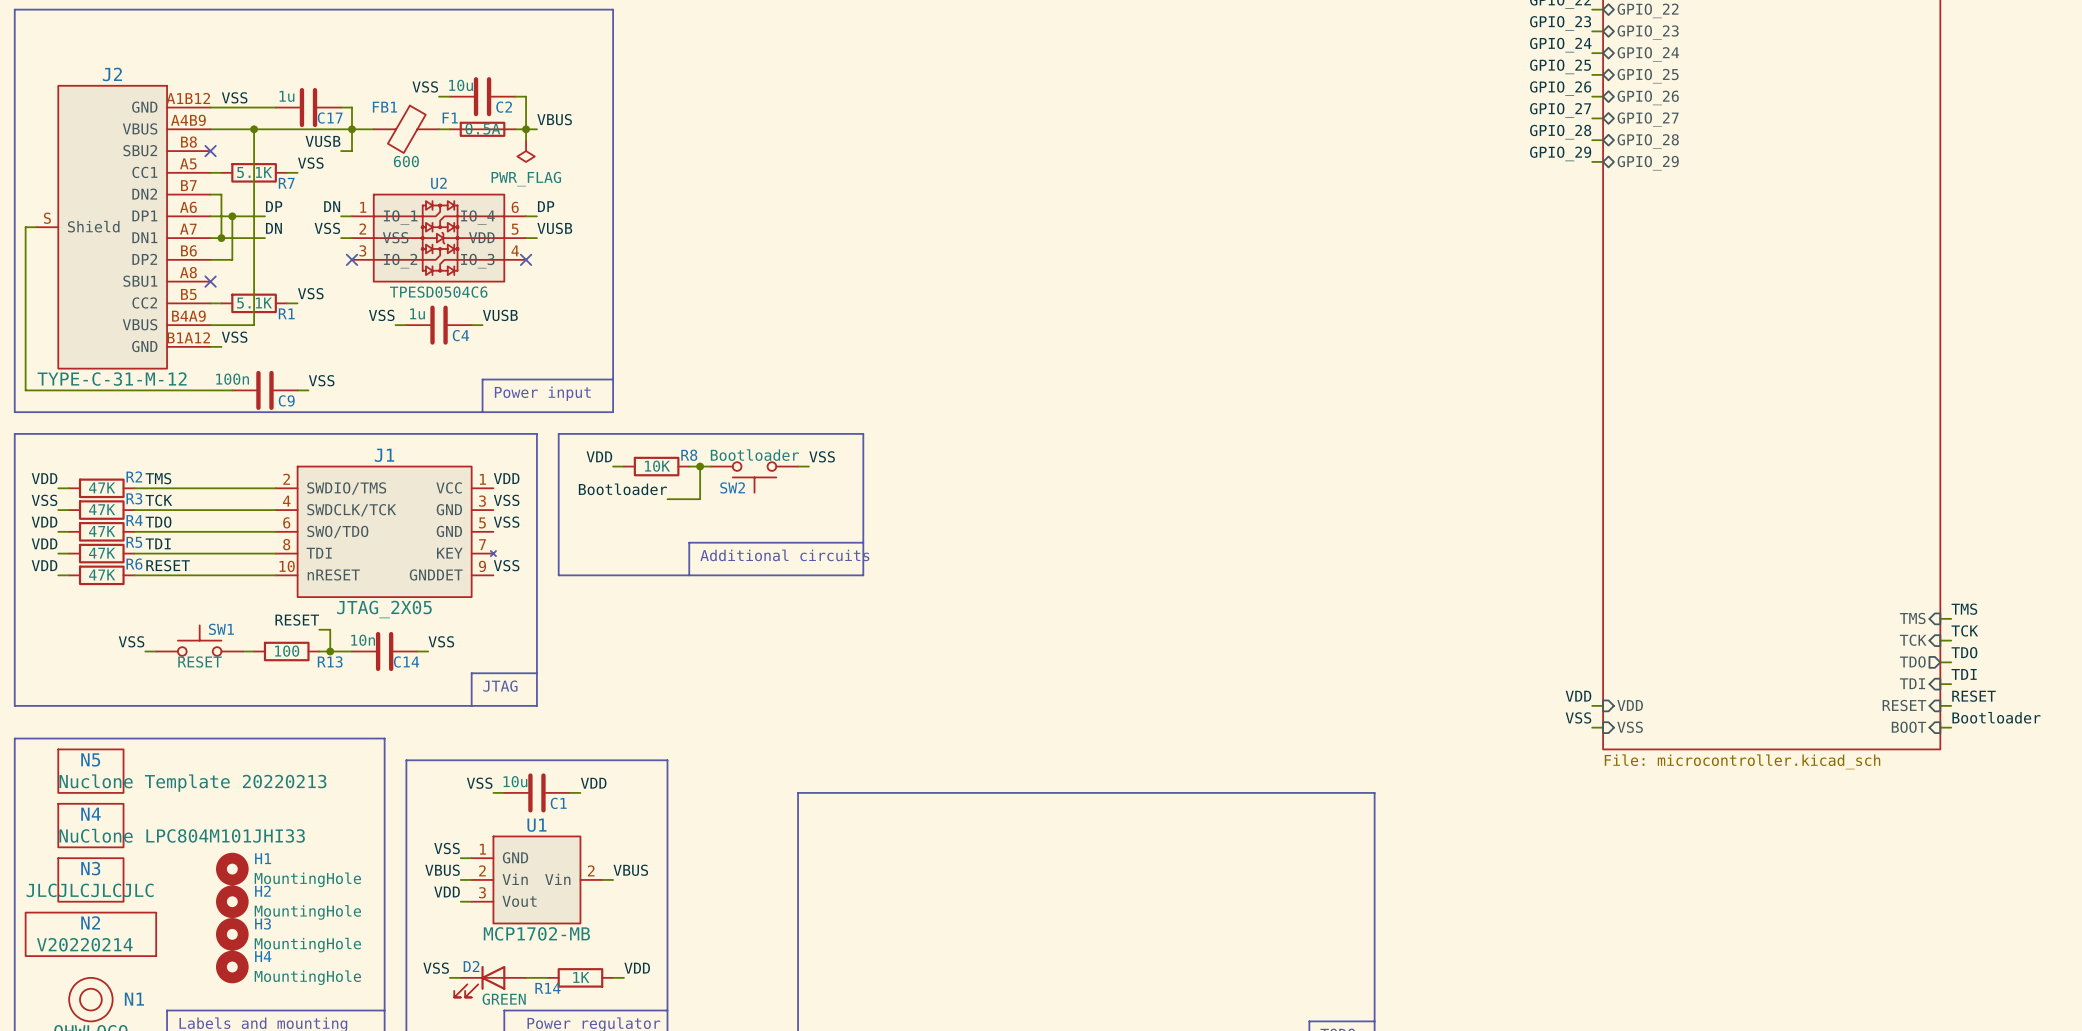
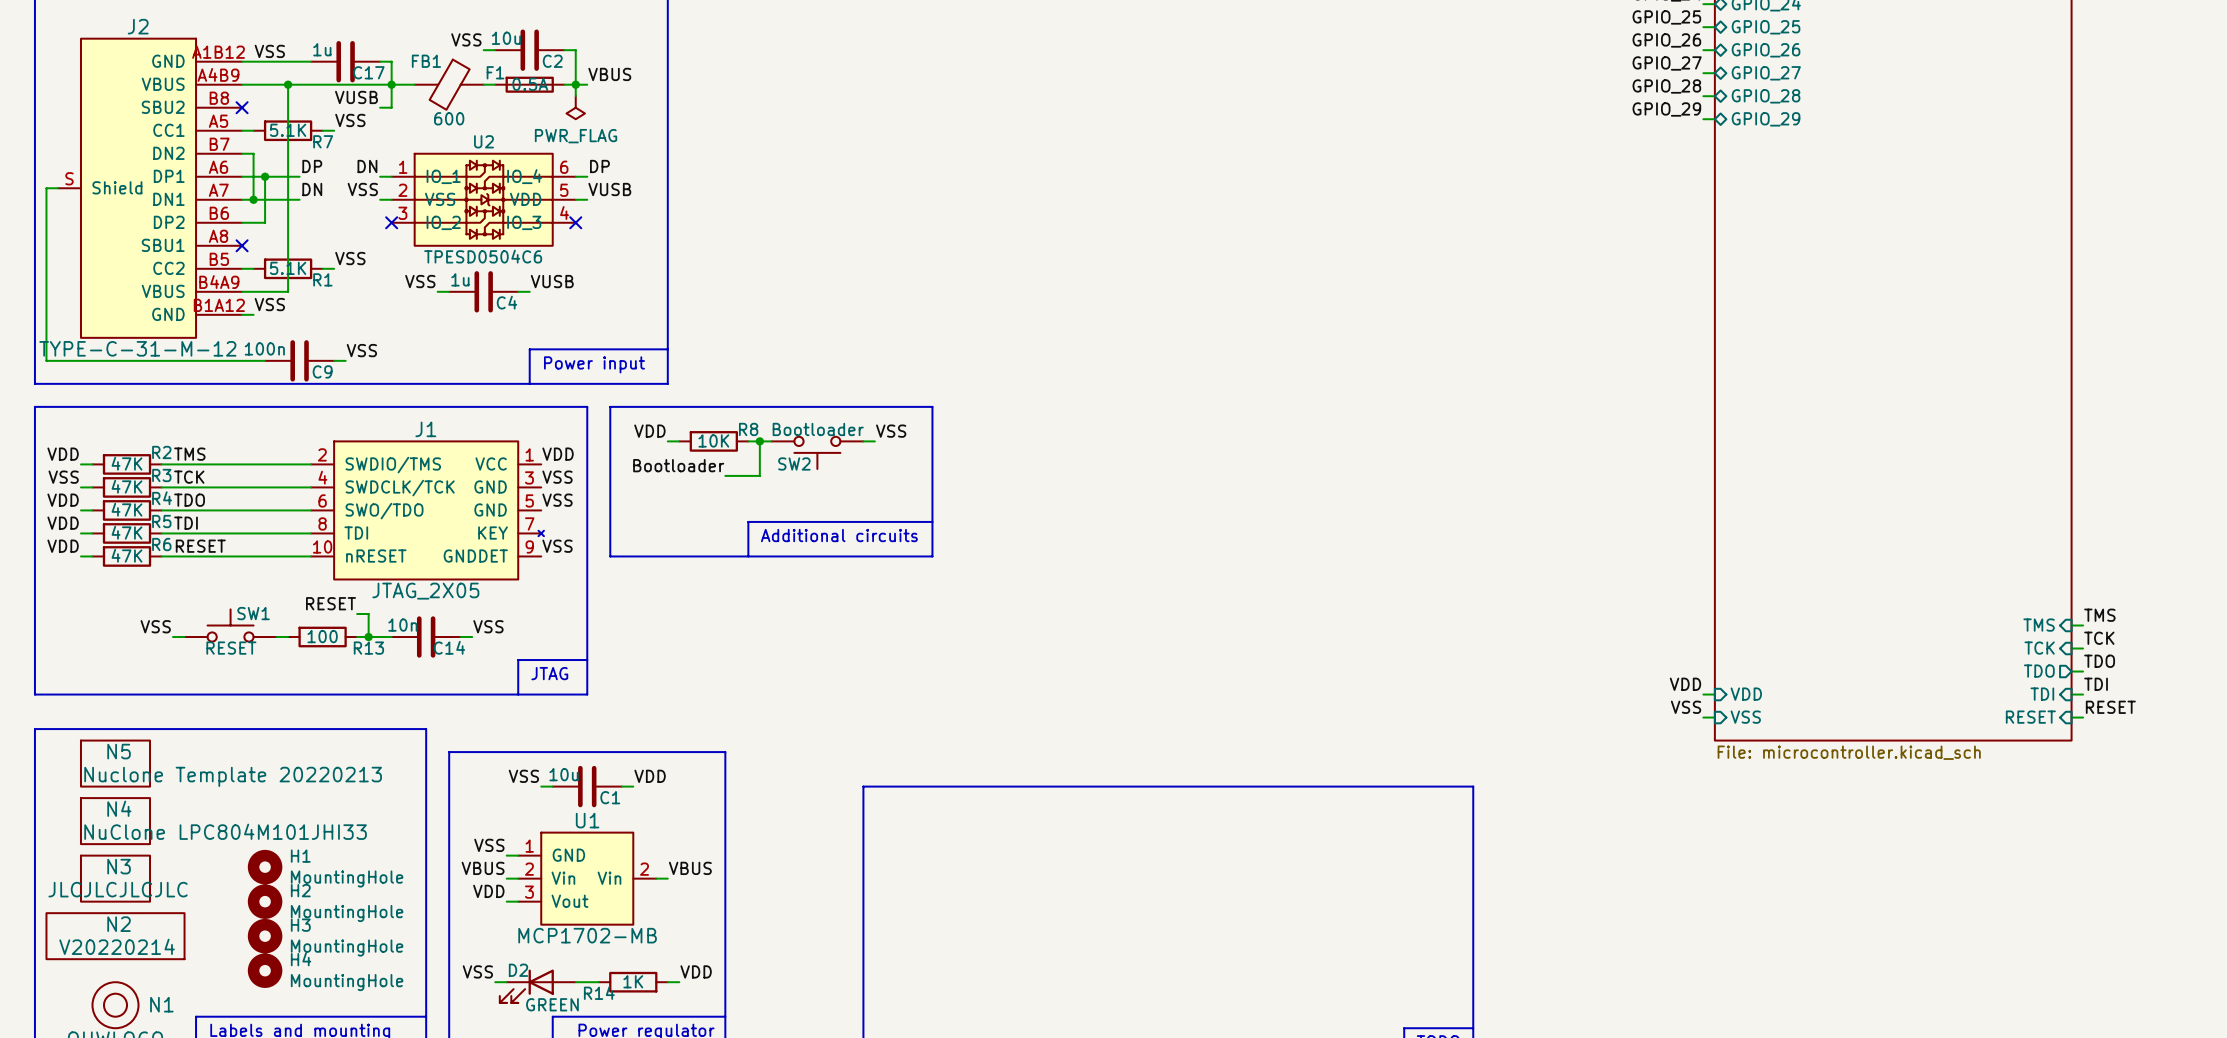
label: TMS (1964, 609) -> none
sheet pin: TMS (1912, 618) -> none
wire: (1940, 618) (1951, 618) -> none
label: TCK (1964, 630) -> TMS (2099, 615)
sheet pin: TCK (1913, 640) -> TMS (2039, 625)
label: TDO (1964, 652) -> TCK (2099, 638)
sheet pin shape: output (1912, 661) -> input (2039, 648)
sheet pin: TDO (1912, 661) -> TCK (2039, 648)
label: TDI (1964, 674) -> TDO (2099, 661)
sheet pin shape: input (1912, 683) -> output (2039, 671)
sheet pin: TDI (1912, 683) -> TDO (2039, 671)
label: RESET (1974, 696) -> TDI (2096, 684)
sheet pin: RESET (1904, 705) -> TDI (2042, 694)
label: Bootloader (1996, 717) -> RESET (2110, 707)
sheet pin: BOOT (1908, 727) -> RESET (2030, 717)

